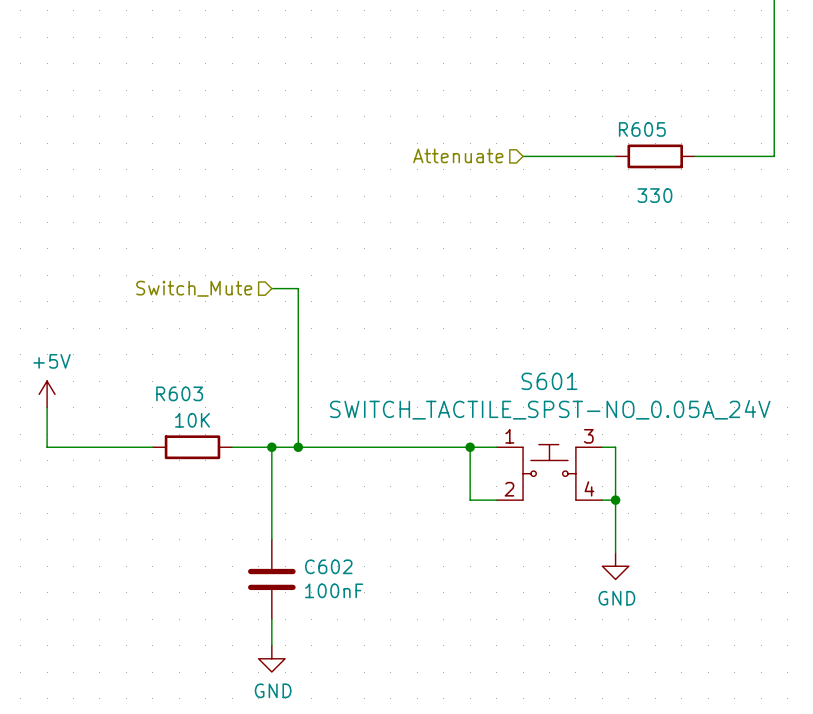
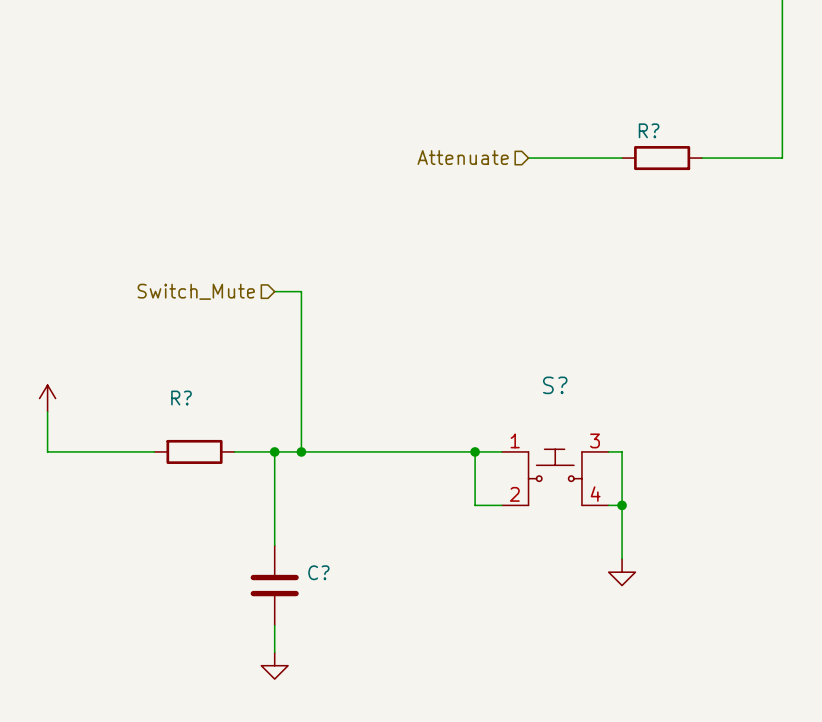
R605 name: R605 (642, 129) -> R? (649, 130)
R605 value: 330 (654, 195) -> none
power symbol text: +5V (52, 361) -> none
S601 name: S601 (549, 381) -> S? (555, 385)
R603 name: R603 (179, 393) -> R? (181, 398)
S601 value: SWITCH_TACTILE_SPST-NO_0.05A_24V (550, 409) -> none
R603 value: 10K (192, 420) -> none
C602 name: C602 (328, 566) -> C? (318, 572)
C602 value: 100nF (334, 590) -> none
power symbol text: GND (616, 598) -> none
power symbol text: GND (273, 690) -> none

